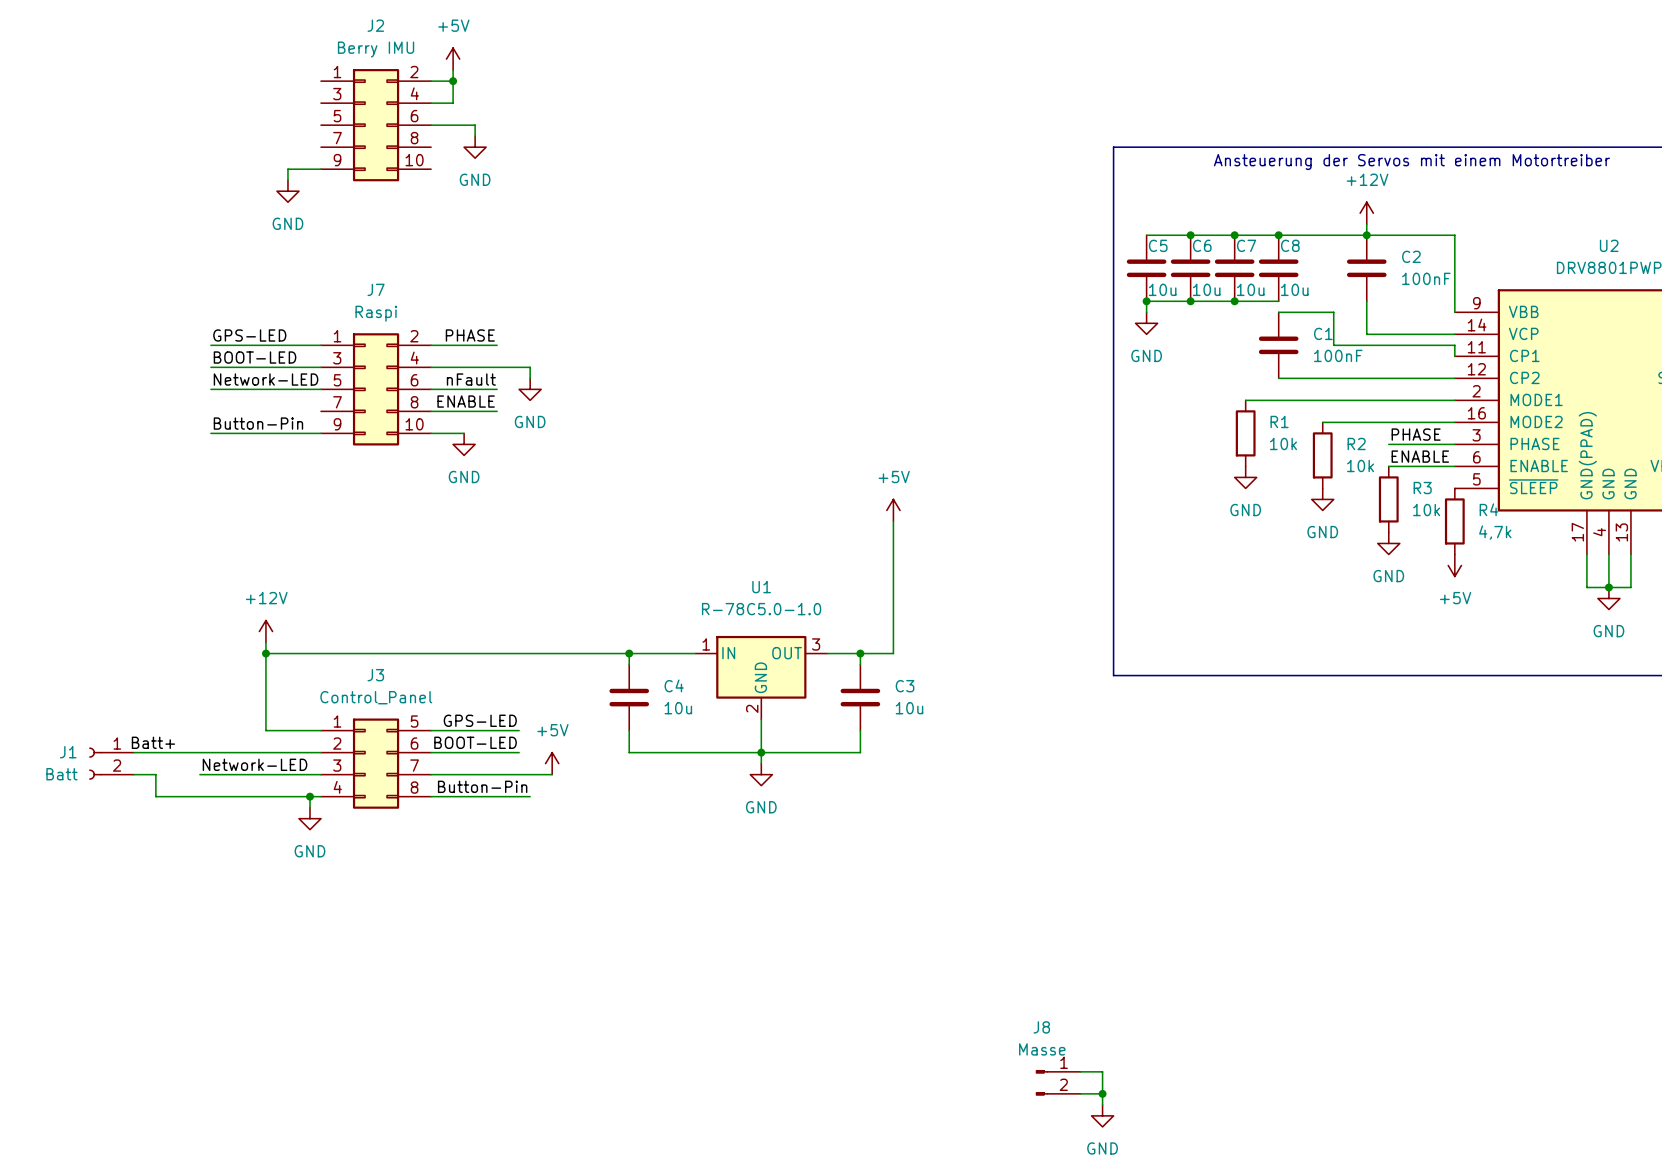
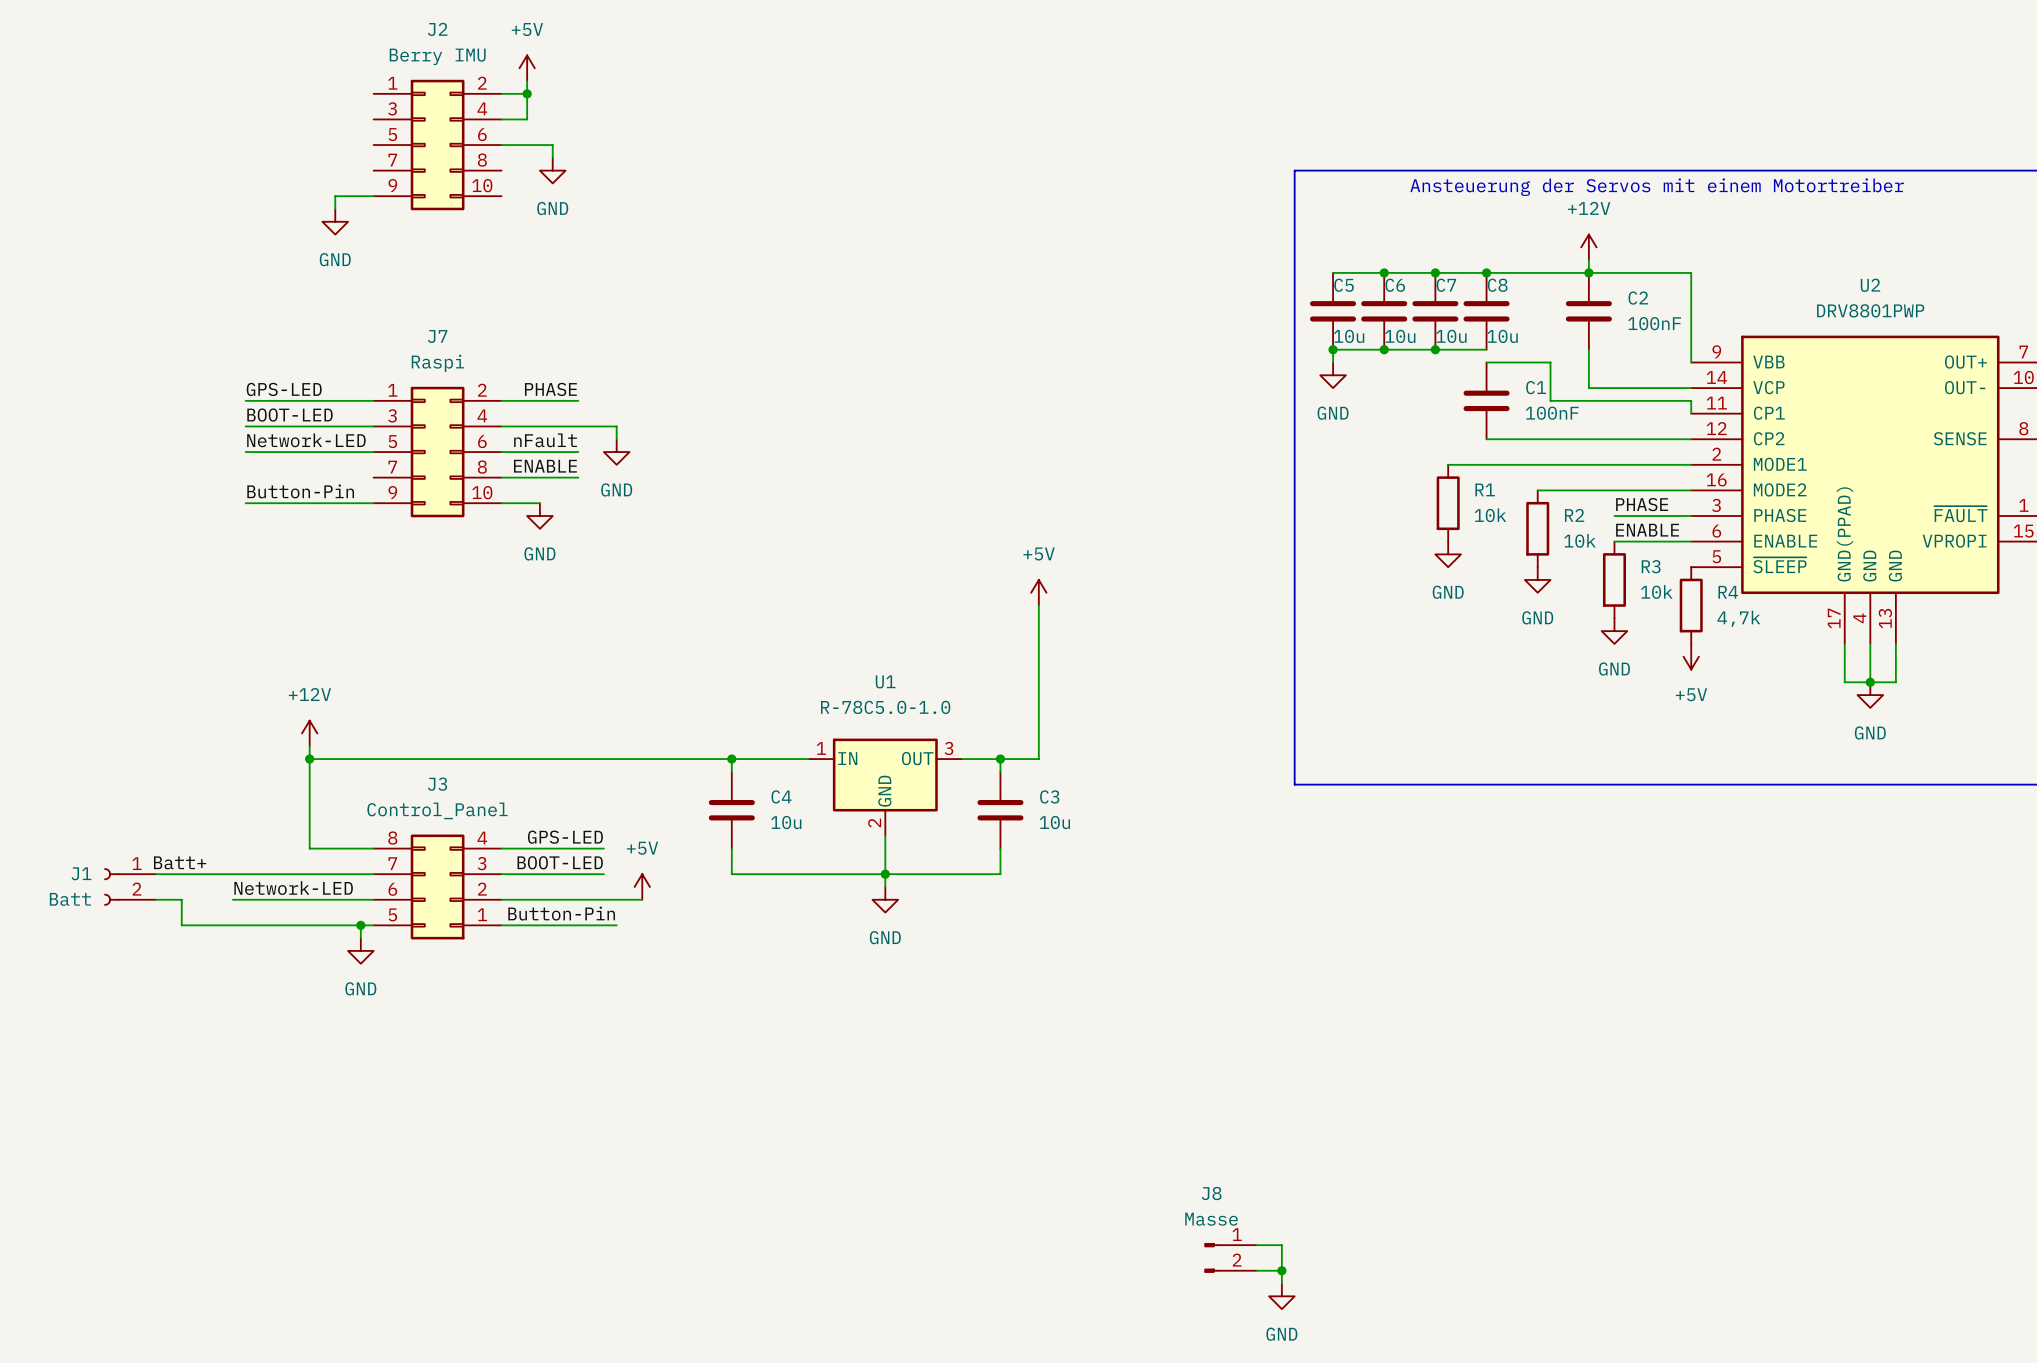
J3 rotation: 0° (376, 763) -> 180° (437, 886)

